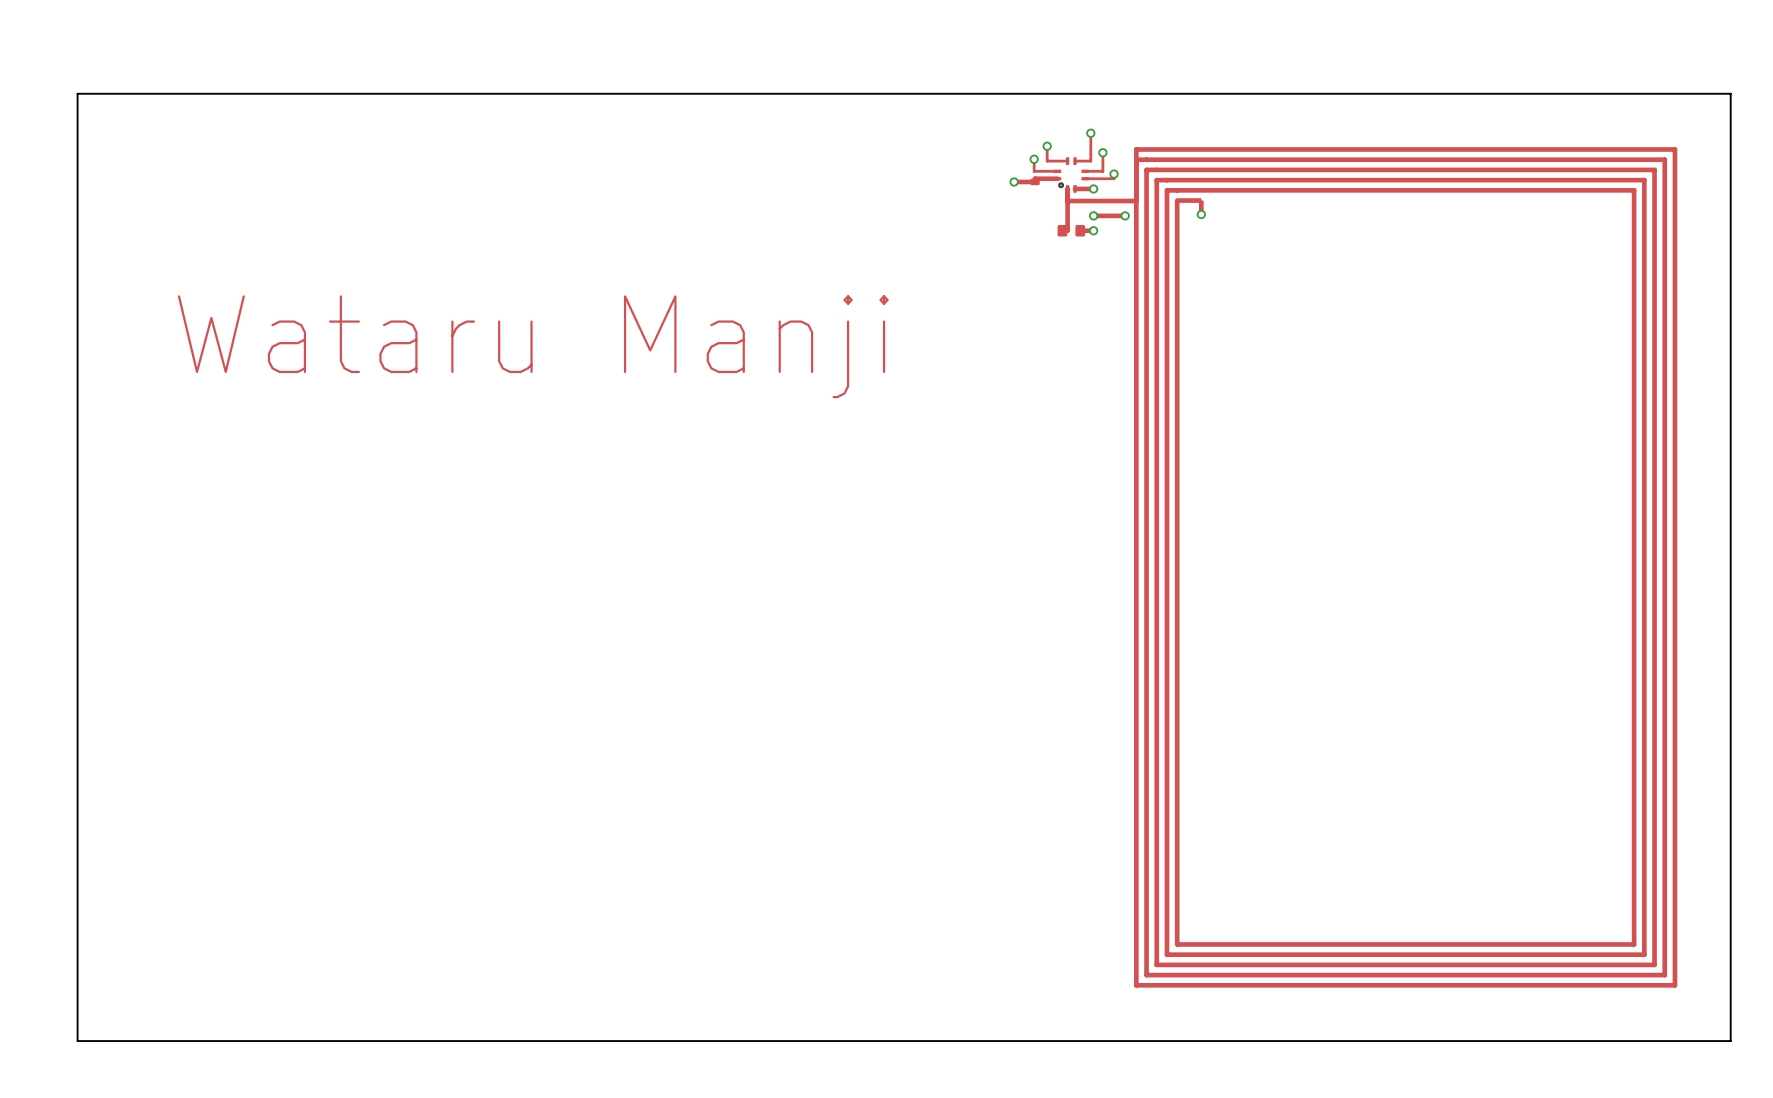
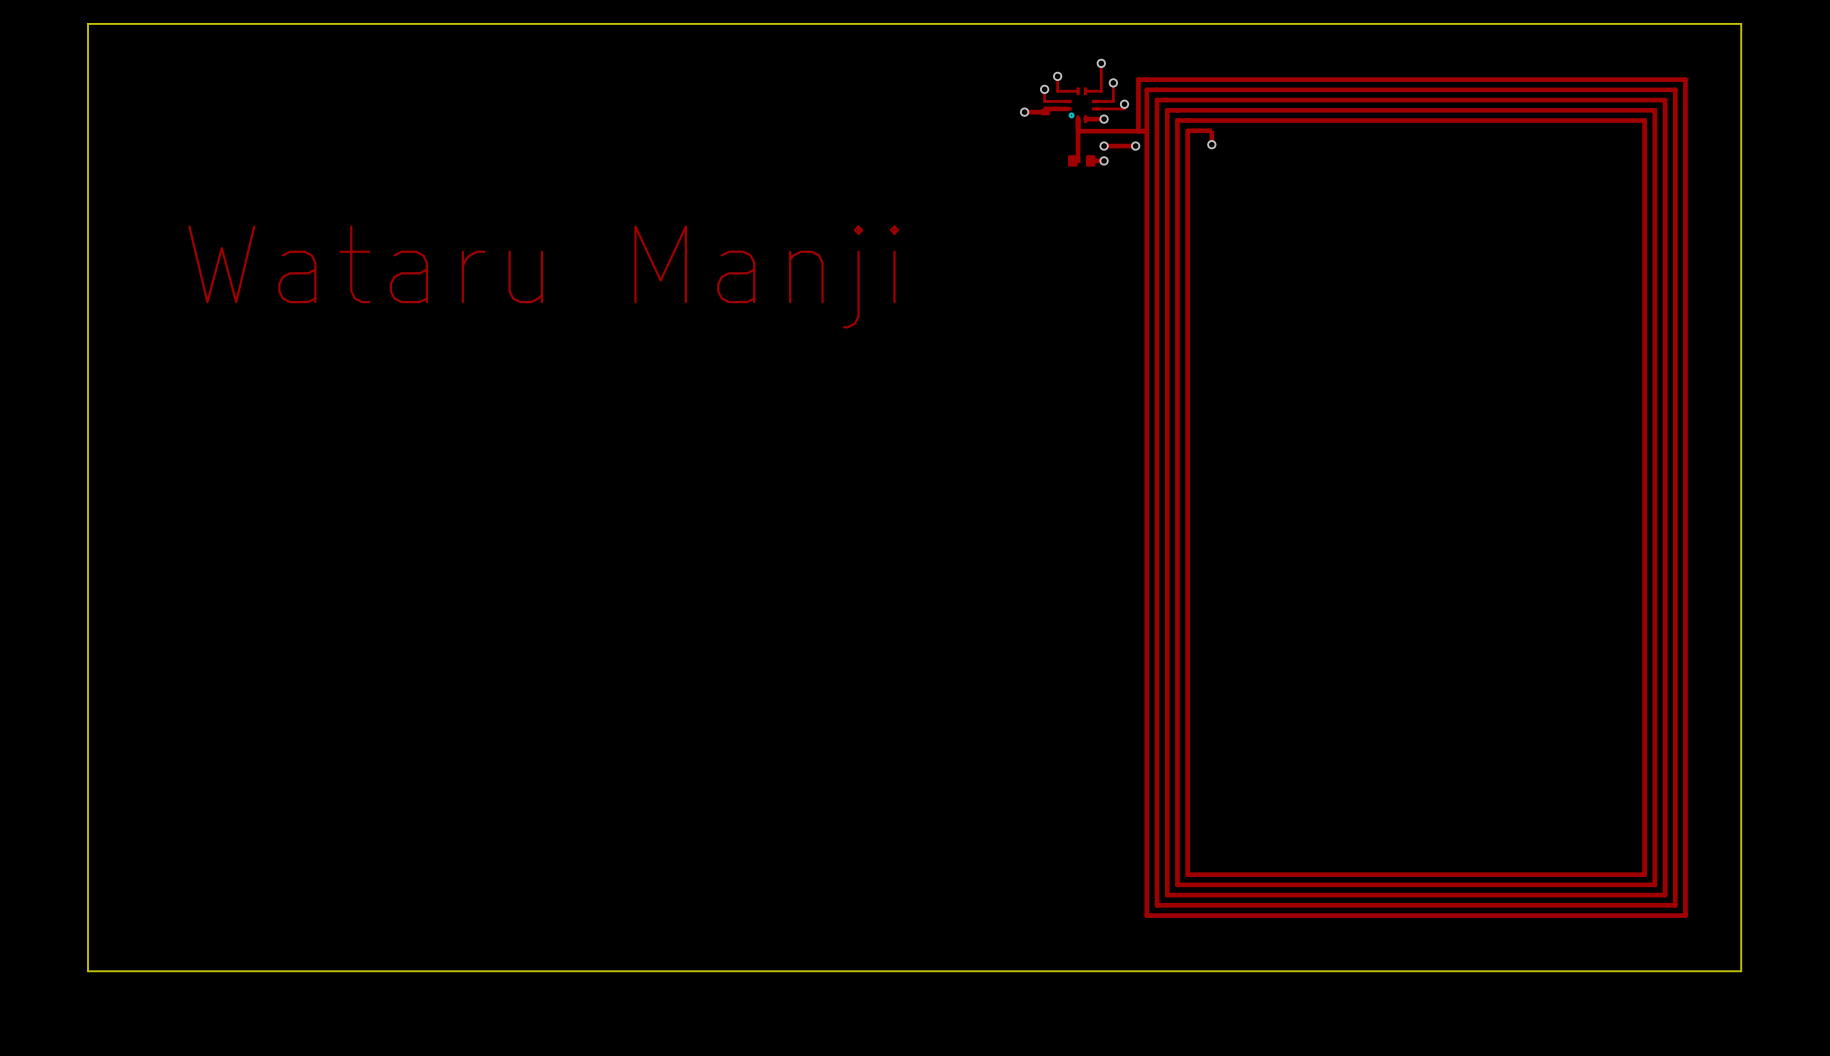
track: (1136, 149) (1136, 159) -> (1146, 79) (1138, 79) (1138, 131)

